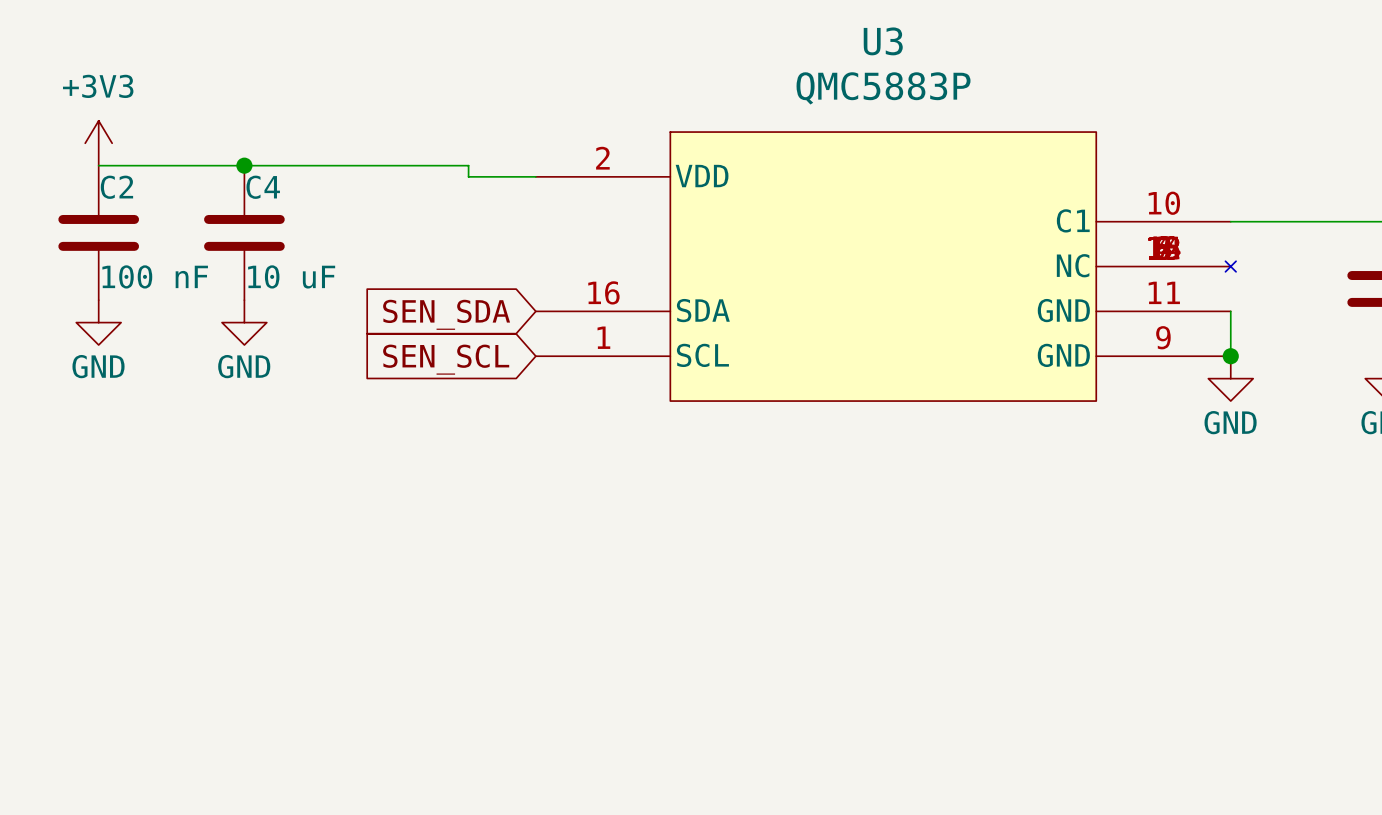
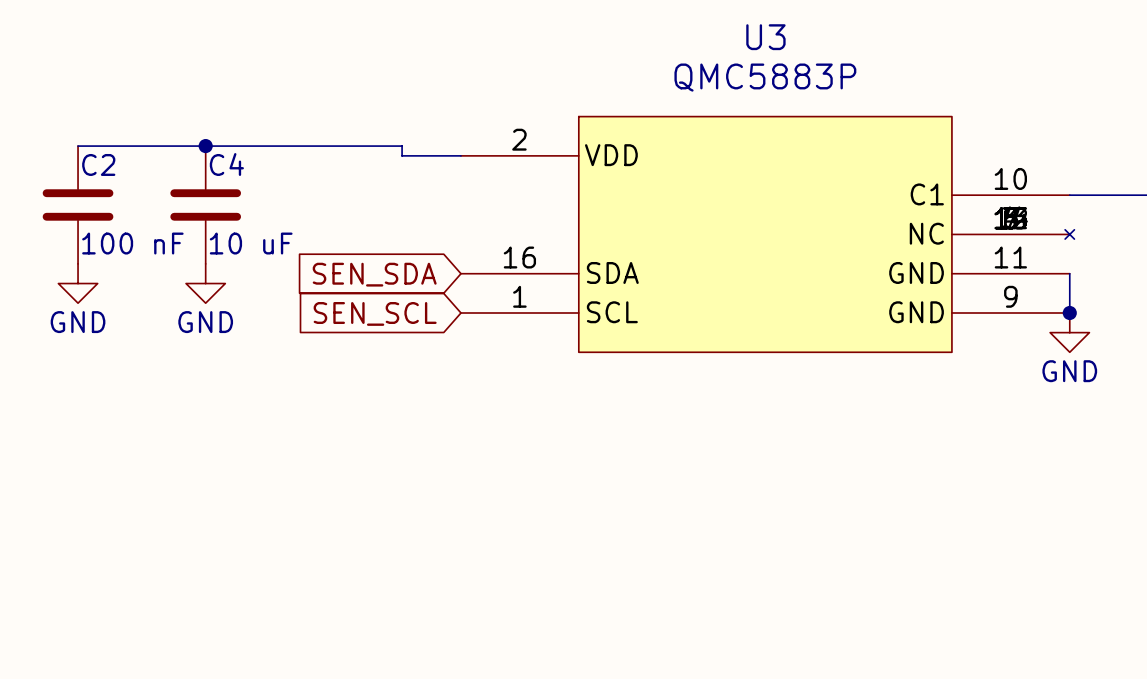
power symbol: +3V3 (98, 143) -> none

